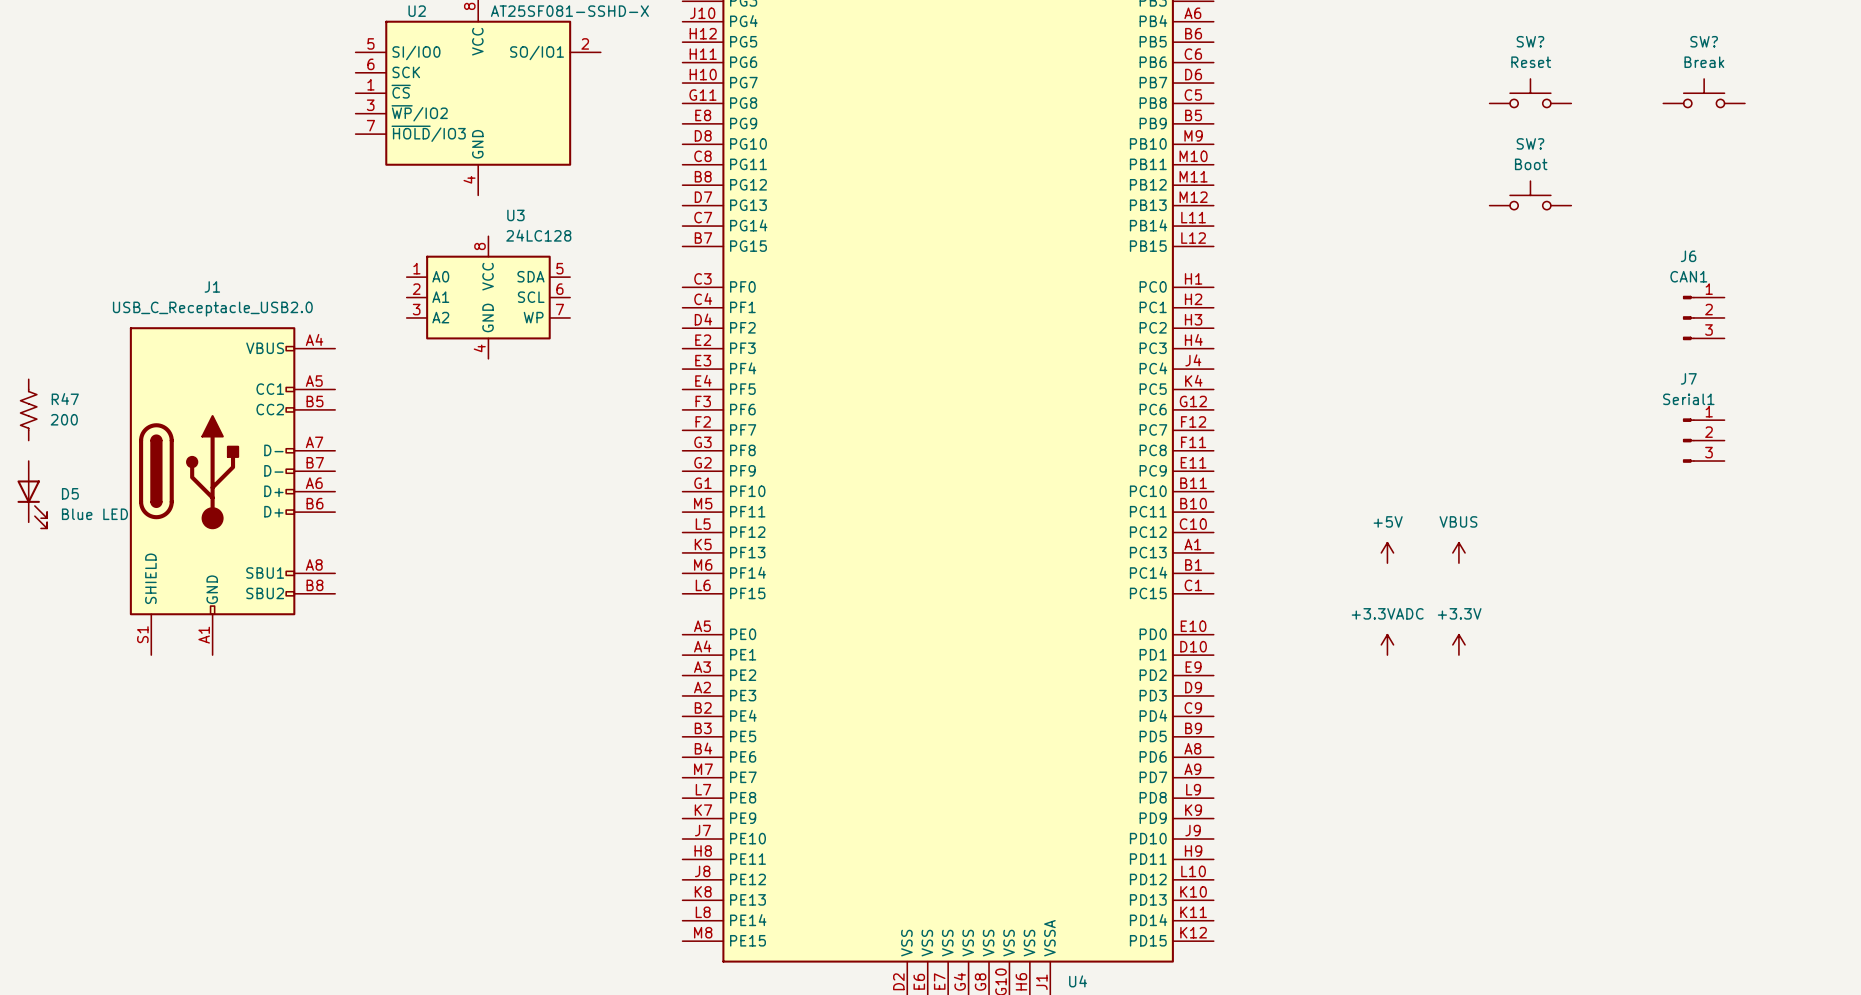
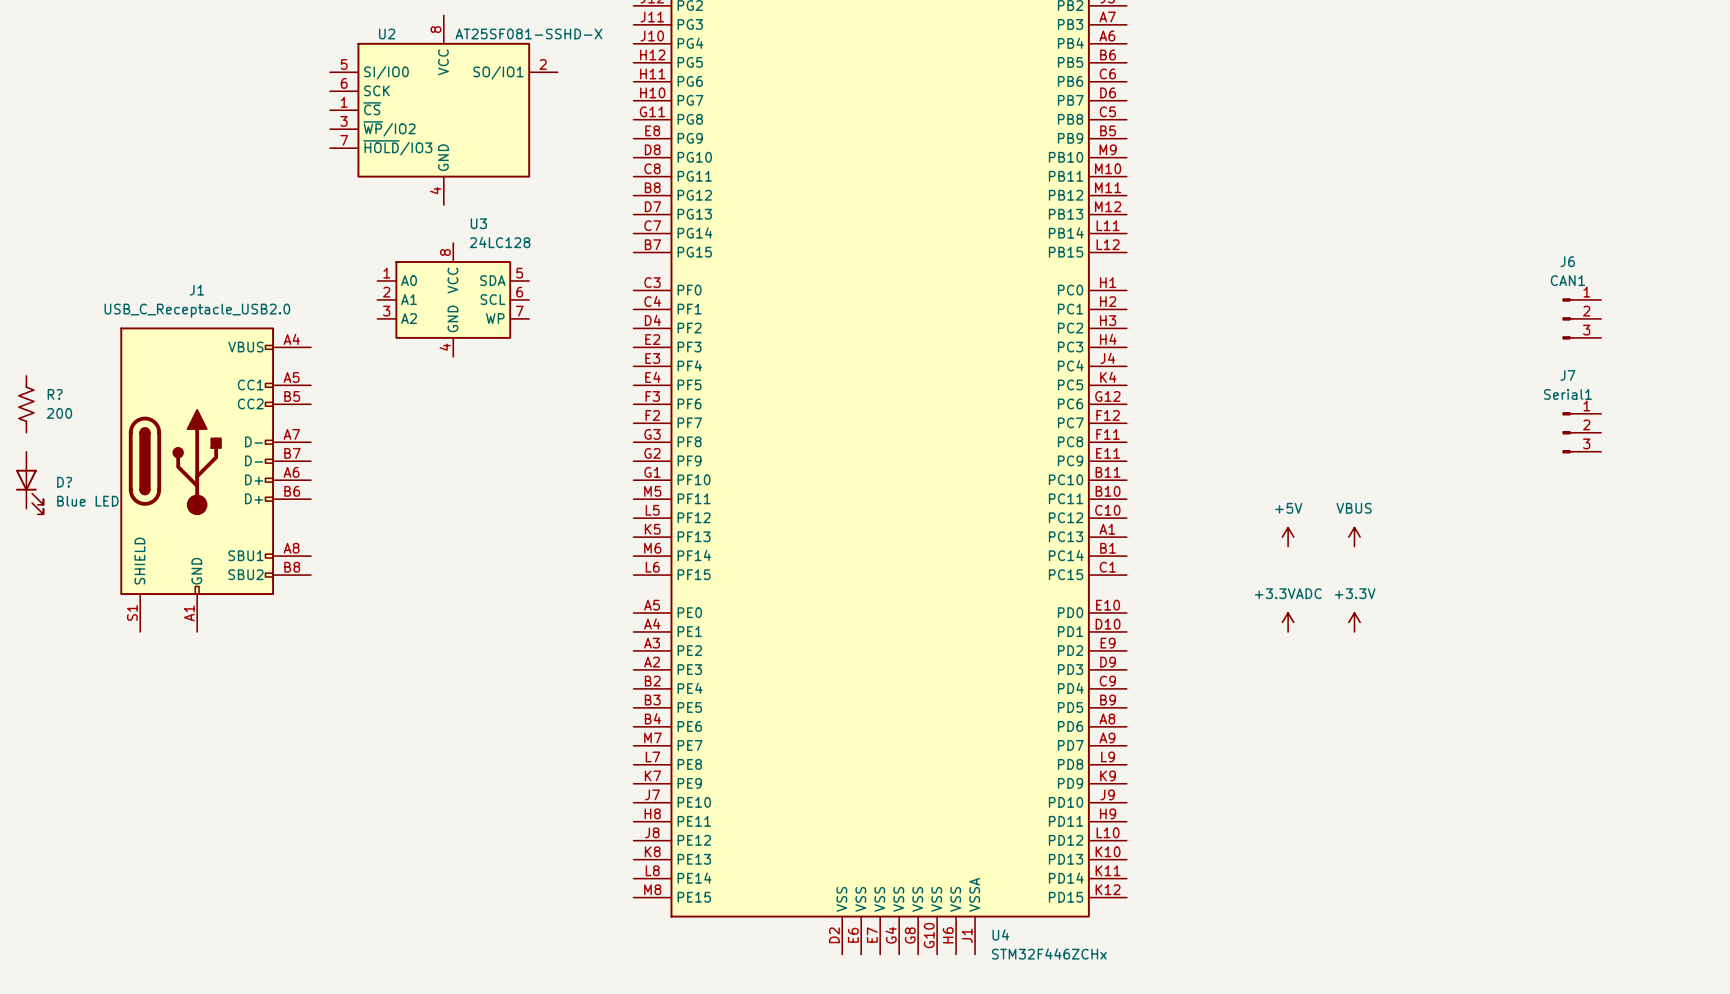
SW?: Reset (1530, 93) -> none
SW?: Break (1704, 93) -> none
SW?: Boot (1530, 195) -> none
R47 name: R47 (65, 399) -> R? (55, 394)
D5 name: D5 (70, 493) -> D? (64, 482)

